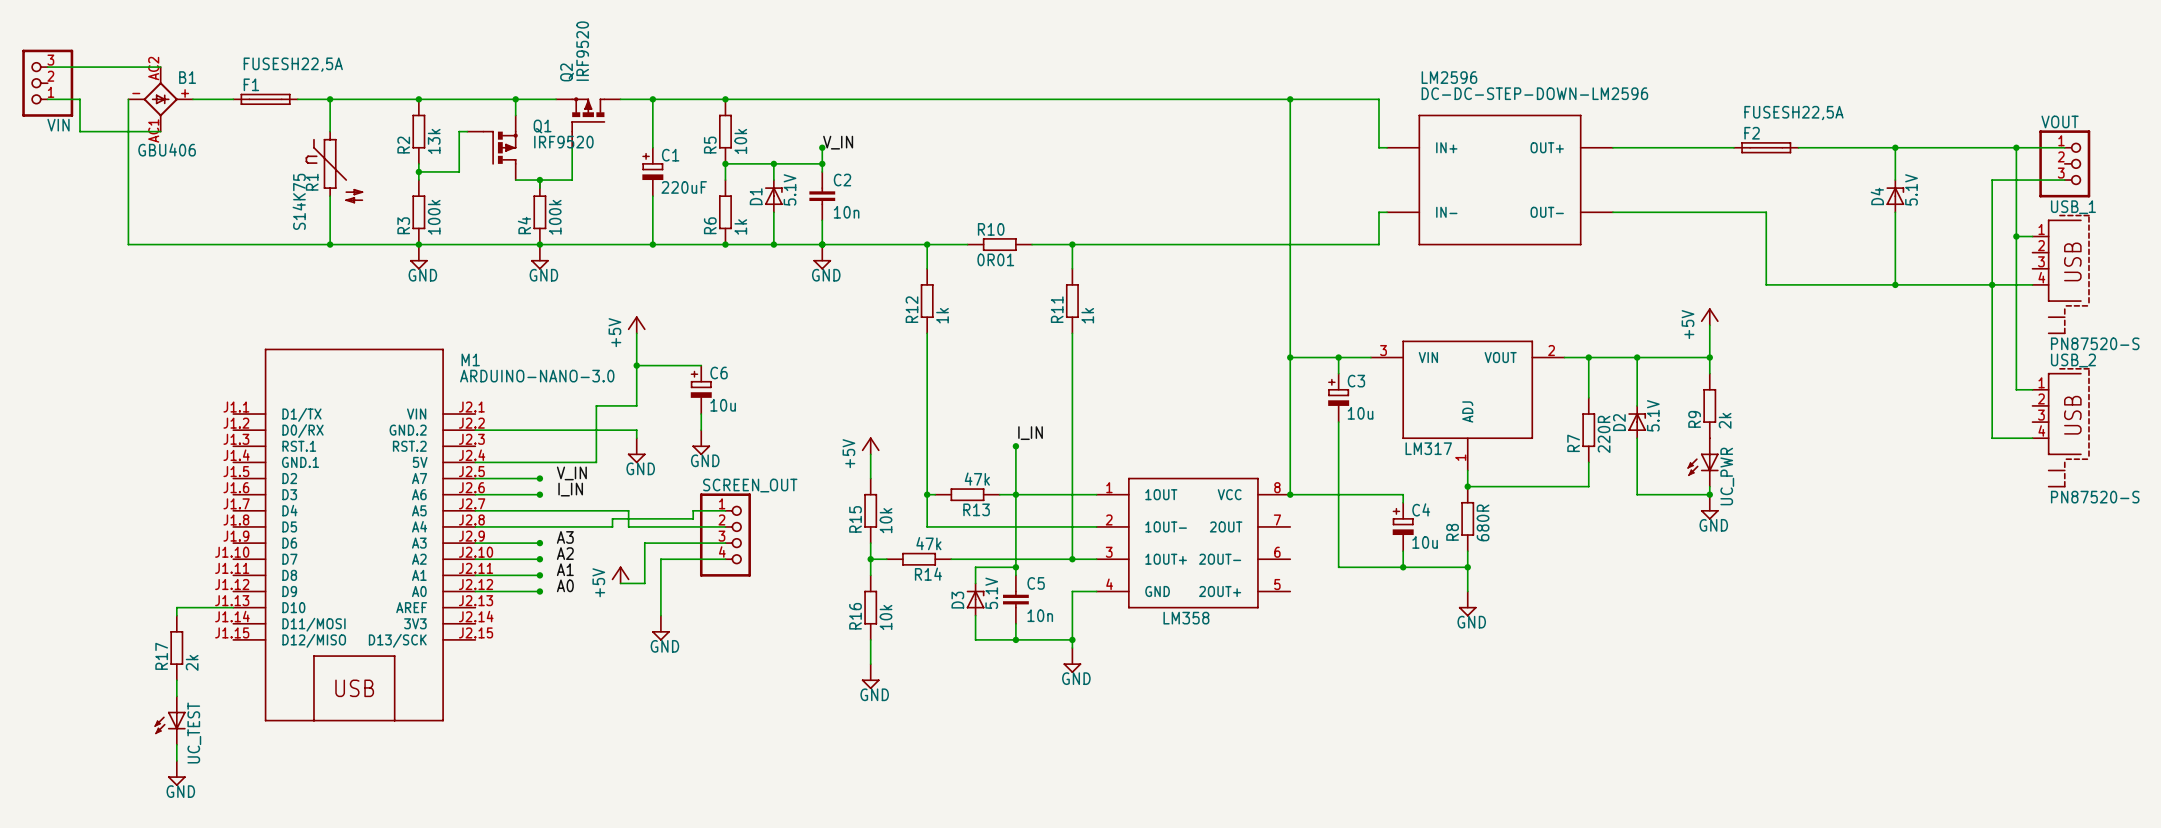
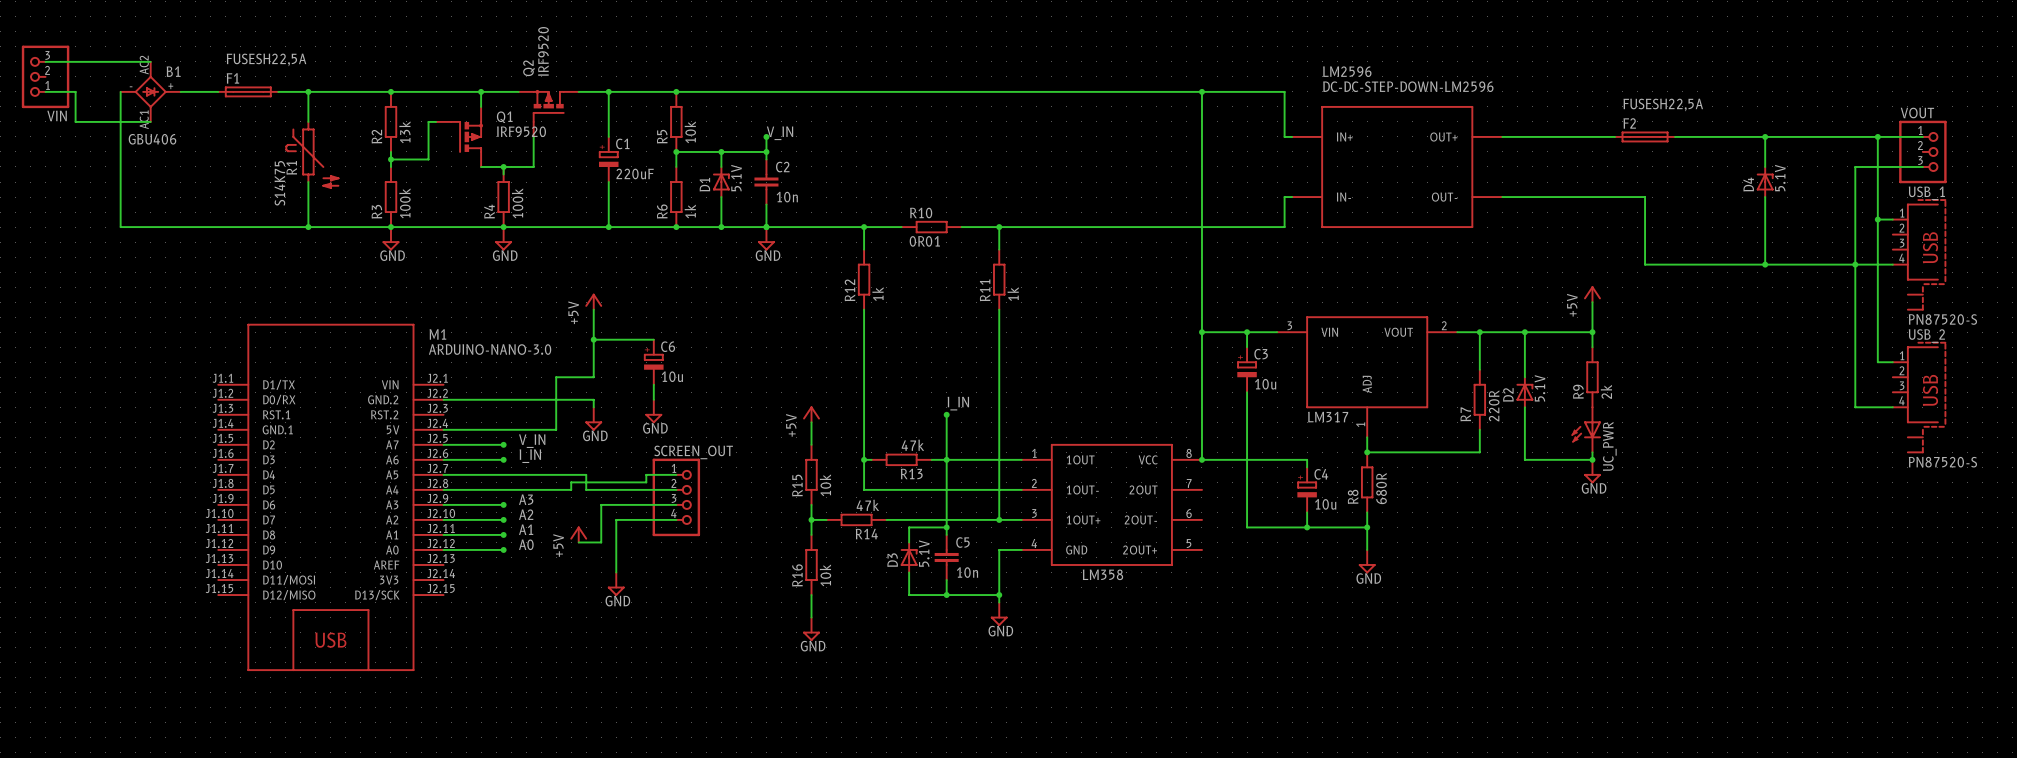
wire: (233, 607) (176, 607) (176, 615) -> none
R17: 2k (176, 647) -> none
wire: (176, 680) (176, 696) -> none
UC_TEST: (170, 720) -> none
wire: (176, 744) (176, 760) -> none
power symbol: GND (176, 773) -> none

